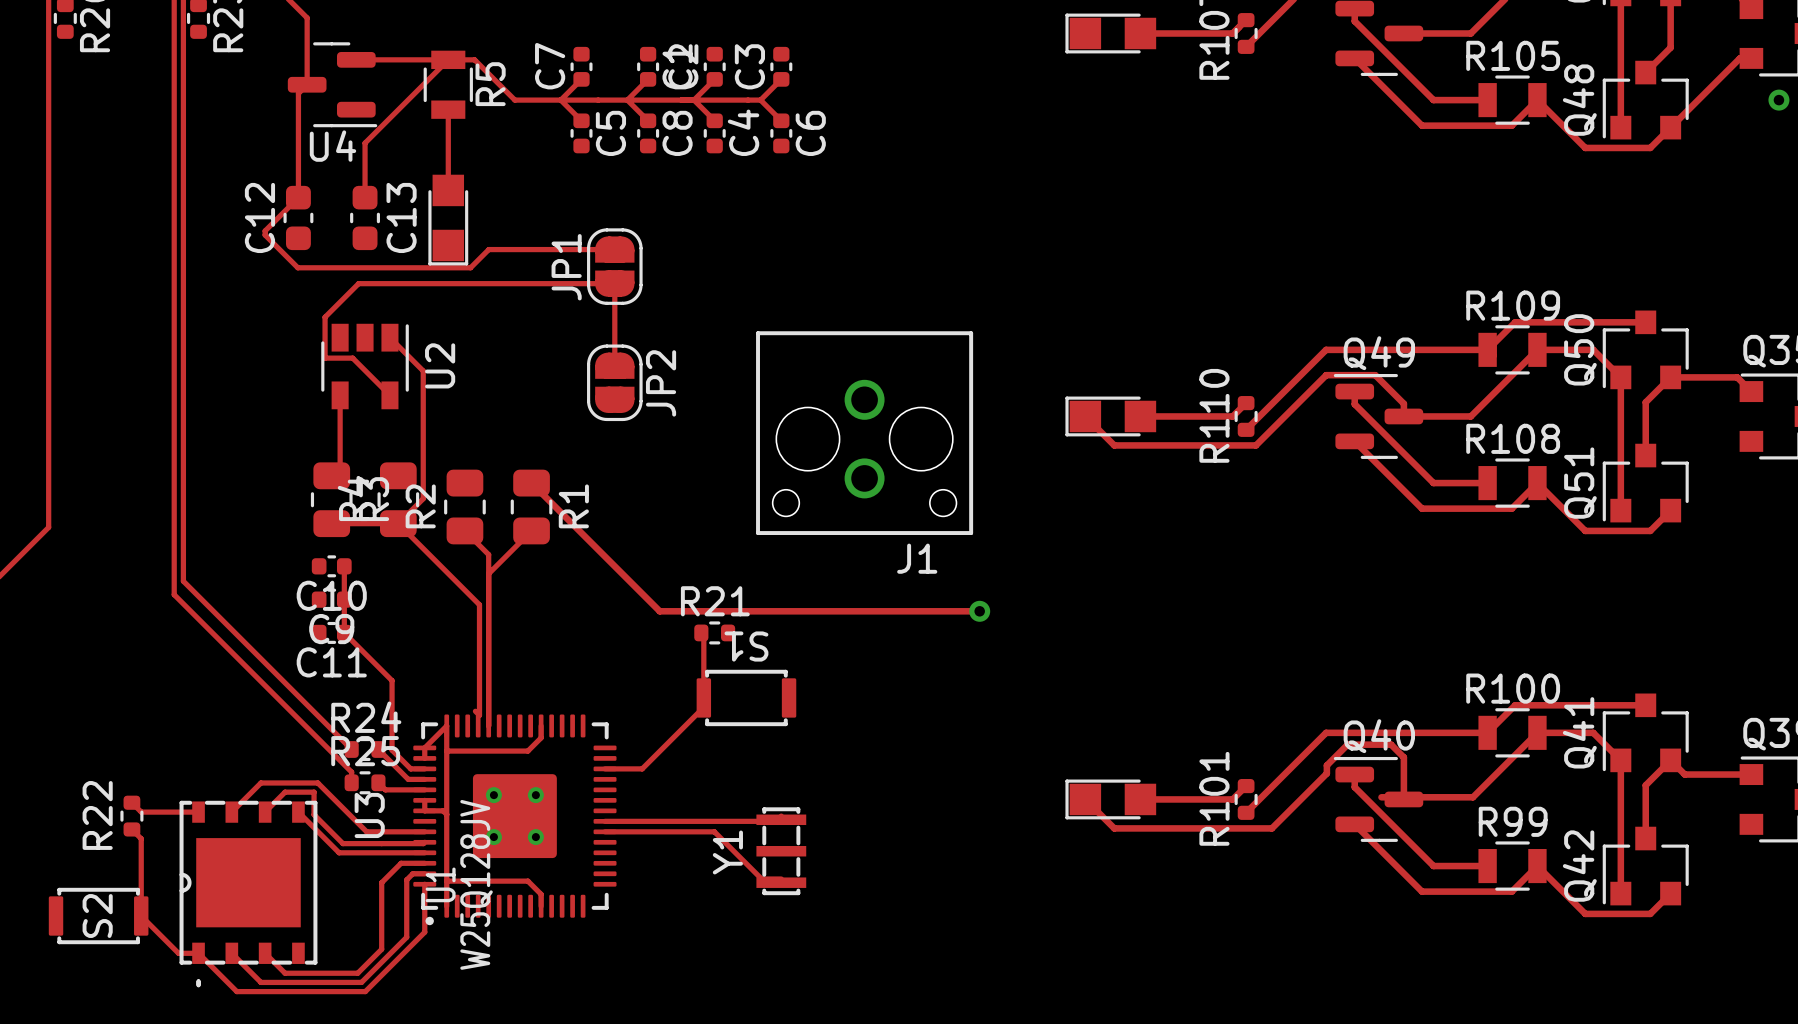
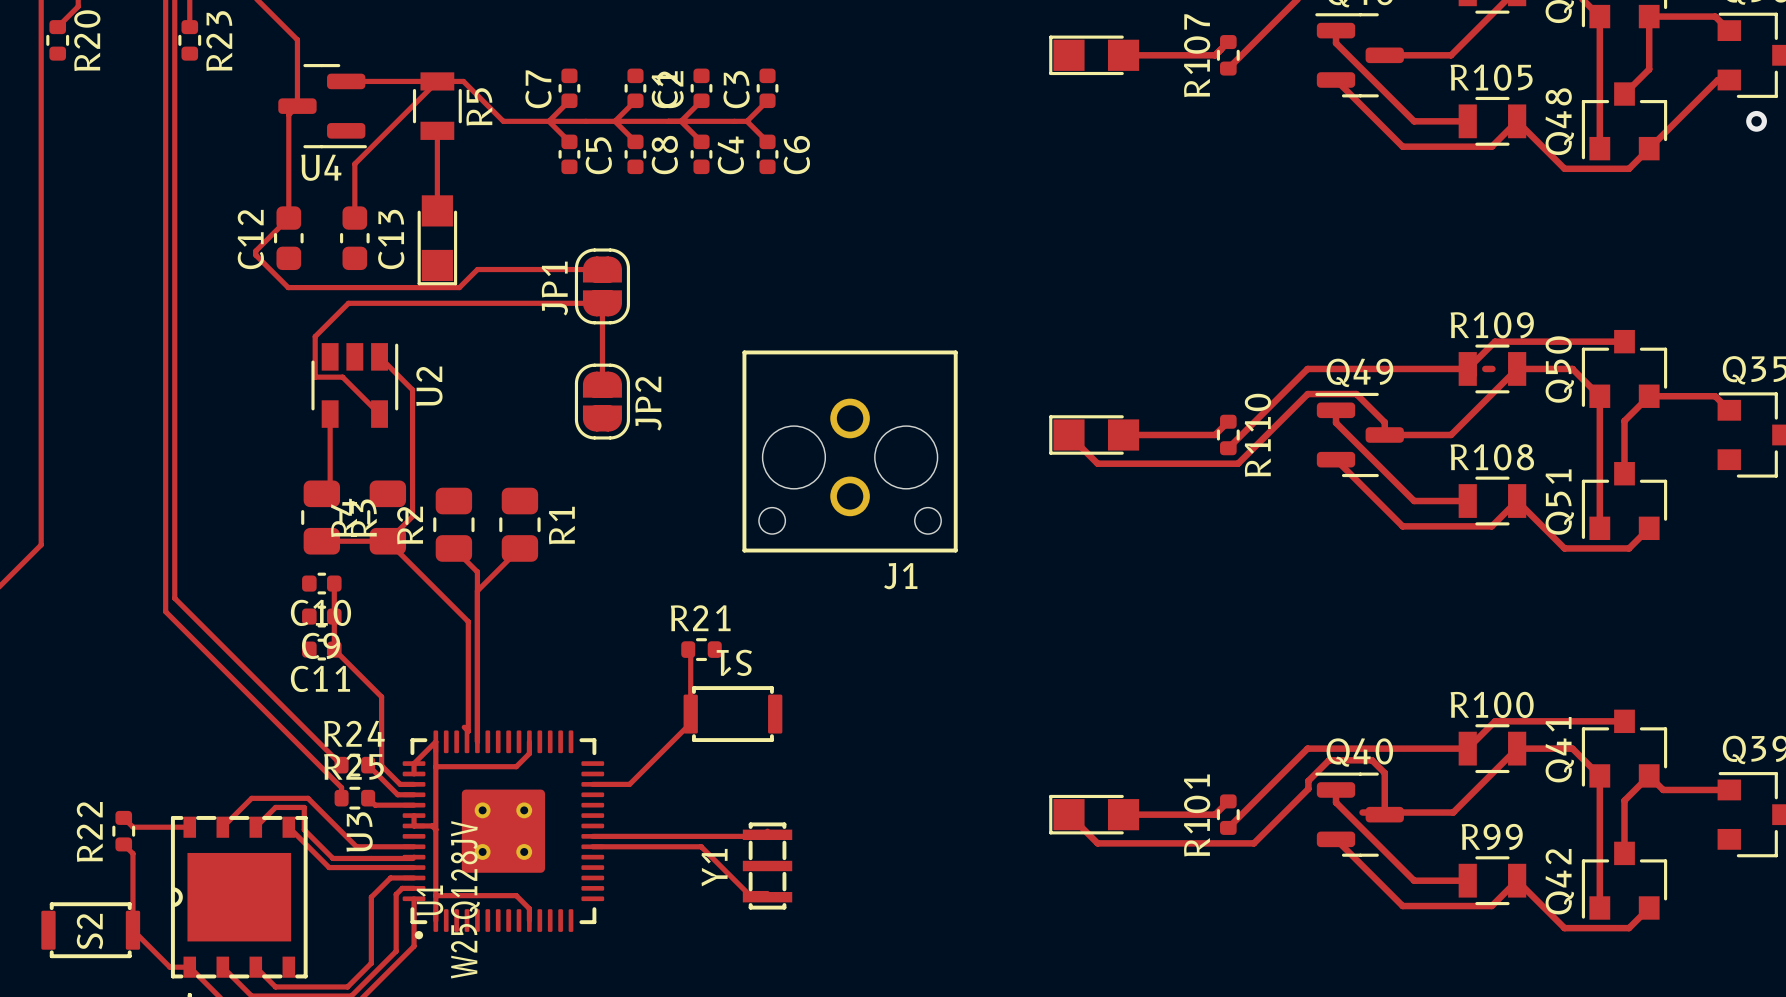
track: none -> (1485, 368) (1492, 368)
R110 name position: R110 (1214, 415) -> R110 (1257, 435)
track: (531, 483) (659, 611) (979, 611) -> none
via: (979, 611) -> none

